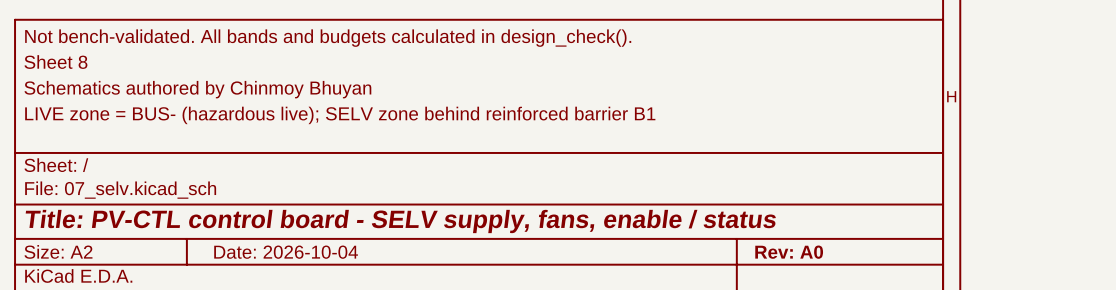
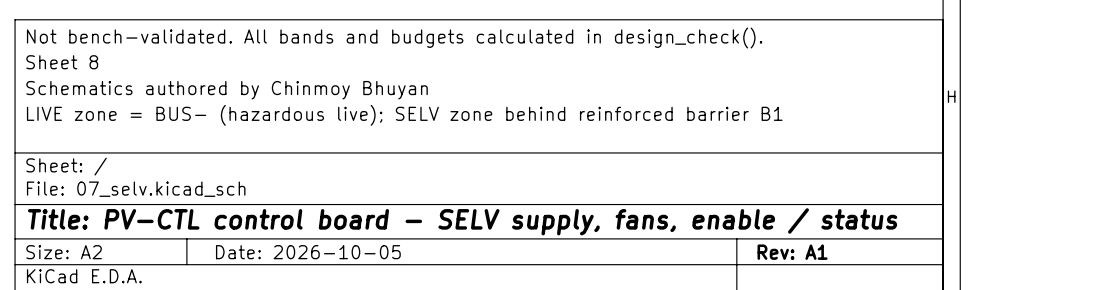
title block: Date: 2026-10-04 (286, 252) -> Date: 2026-10-05 (308, 252)
title block: Rev: A0 (789, 252) -> Rev: A1 (792, 252)

